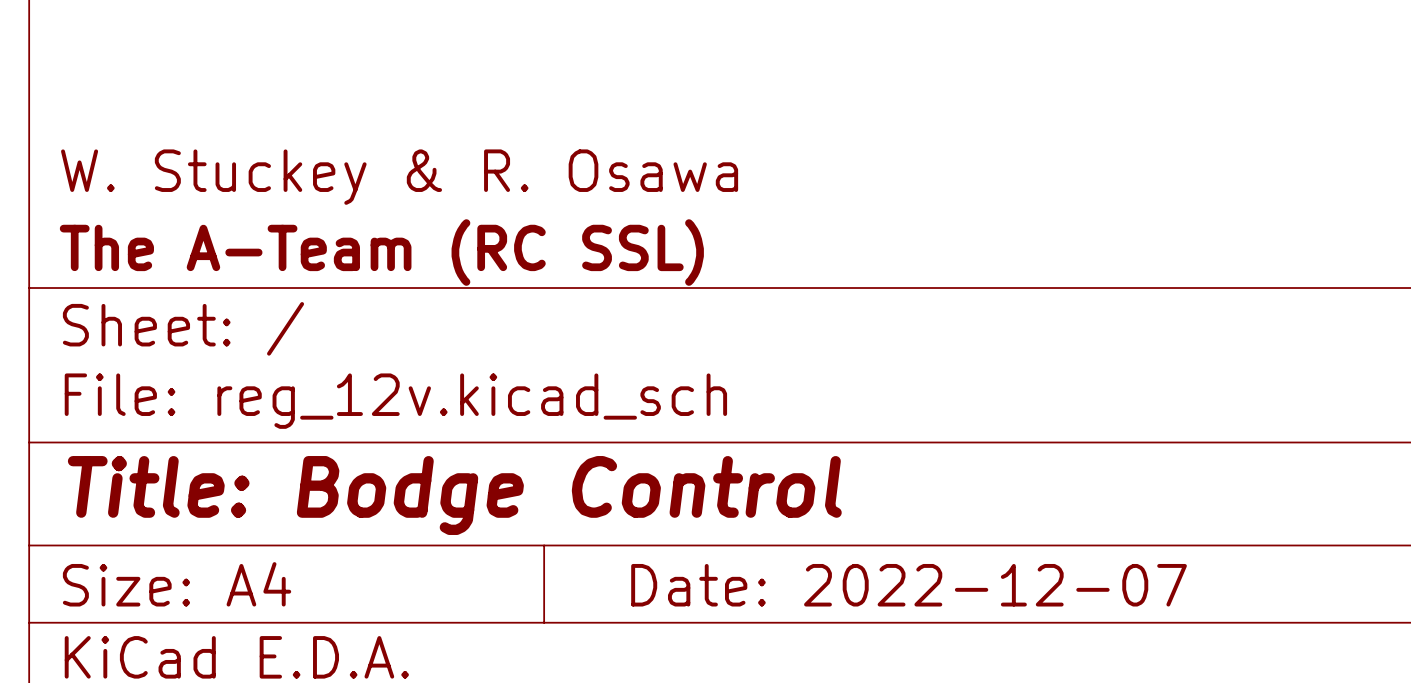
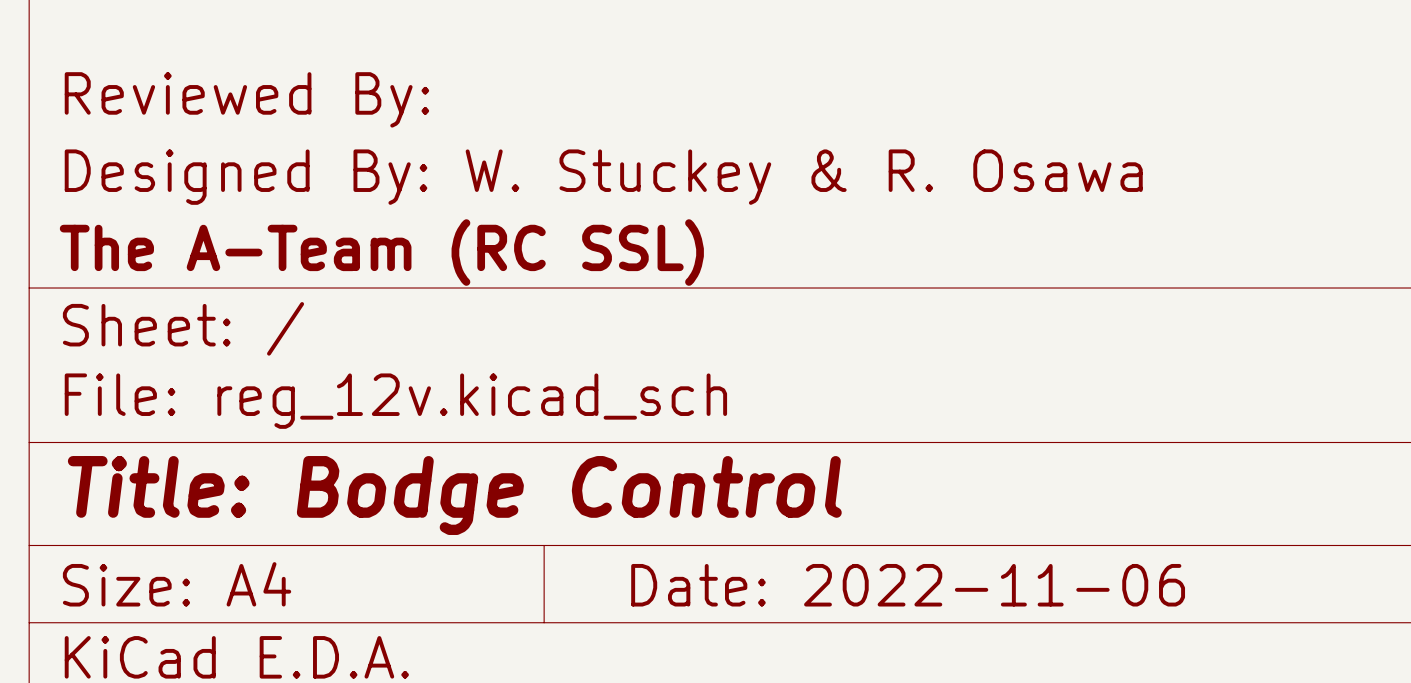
title block: none -> Reviewed By: (246, 99)
title block: W. Stuckey & R. Osawa (399, 177) -> Designed By: W. Stuckey & R. Osawa (603, 177)
title block: Date: 2022-12-07 (909, 585) -> Date: 2022-11-06 (908, 585)

